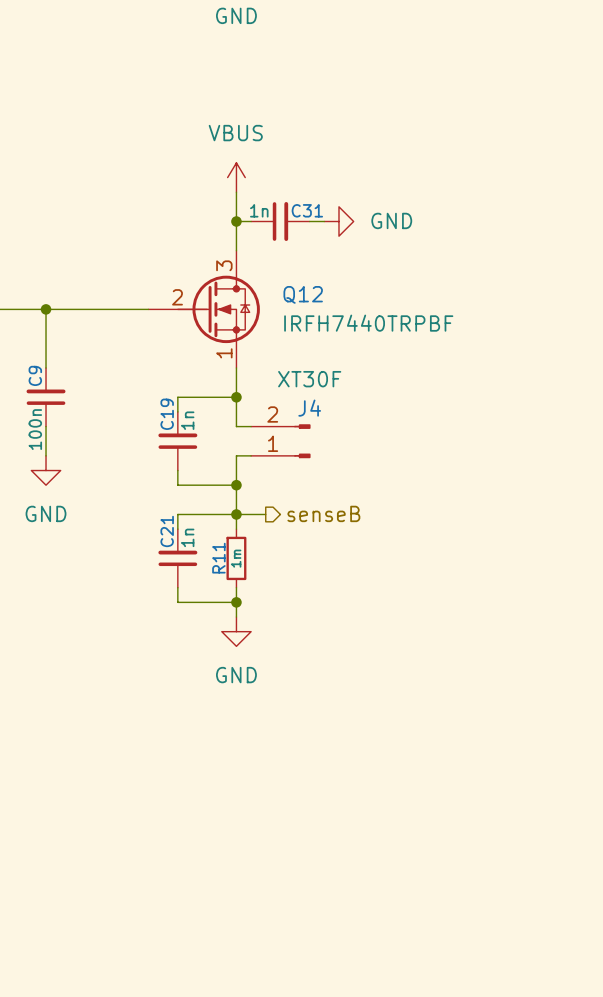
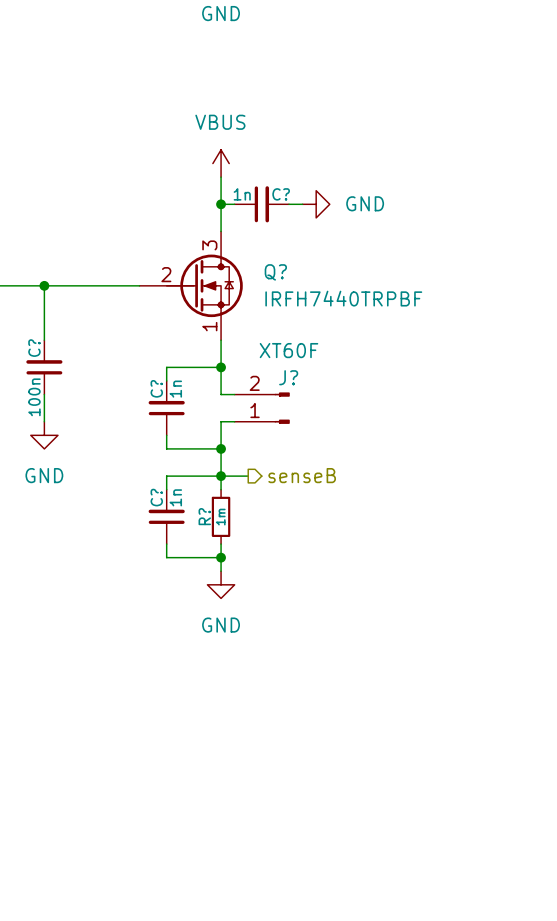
C31 name: C31 (307, 210) -> C? (281, 194)
Q12 name: Q12 (303, 294) -> Q? (275, 272)
C9 name: C9 (35, 375) -> C? (34, 348)
J4 value: XT30F (309, 379) -> XT60F (288, 350)
J4 name: J4 (309, 408) -> J? (288, 377)
C19 name: C19 (167, 414) -> C? (156, 388)
C21 name: C21 (167, 531) -> C? (156, 497)
R11 name: R11 (218, 558) -> R? (204, 516)

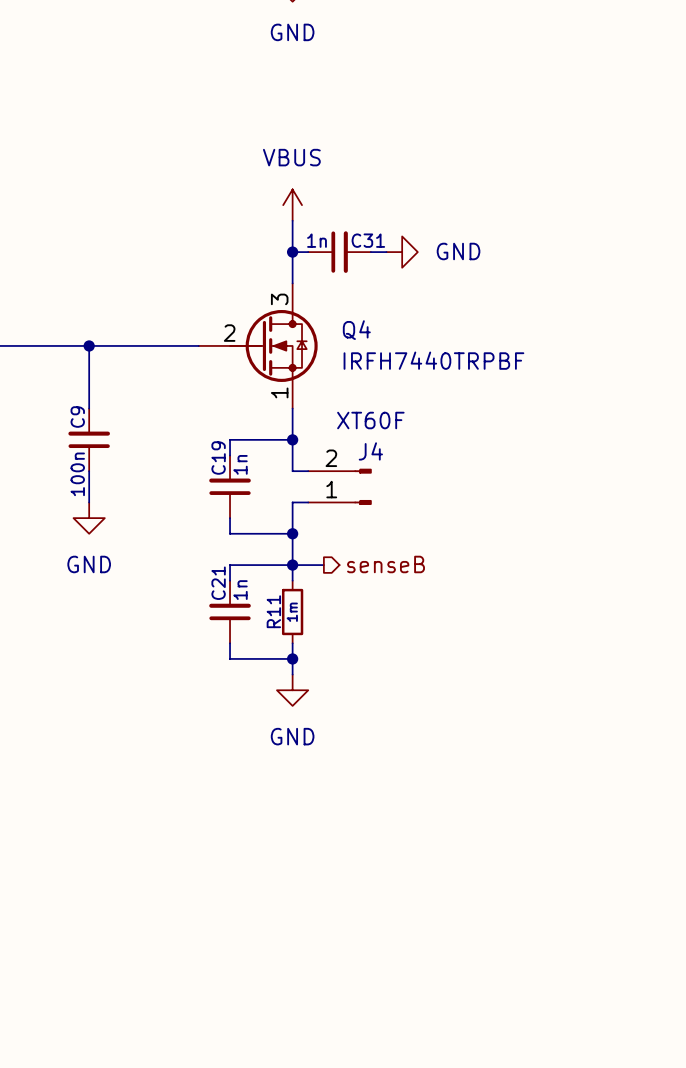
C? name: C? (281, 194) -> C31 (368, 240)
Q? name: Q? (275, 272) -> Q4 (356, 330)
C? name: C? (34, 348) -> C9 (77, 417)
J? name: J? (288, 377) -> J4 (370, 451)
C? name: C? (156, 388) -> C19 (218, 458)
C? name: C? (156, 497) -> C21 (218, 583)
R? name: R? (204, 516) -> R11 (273, 611)

